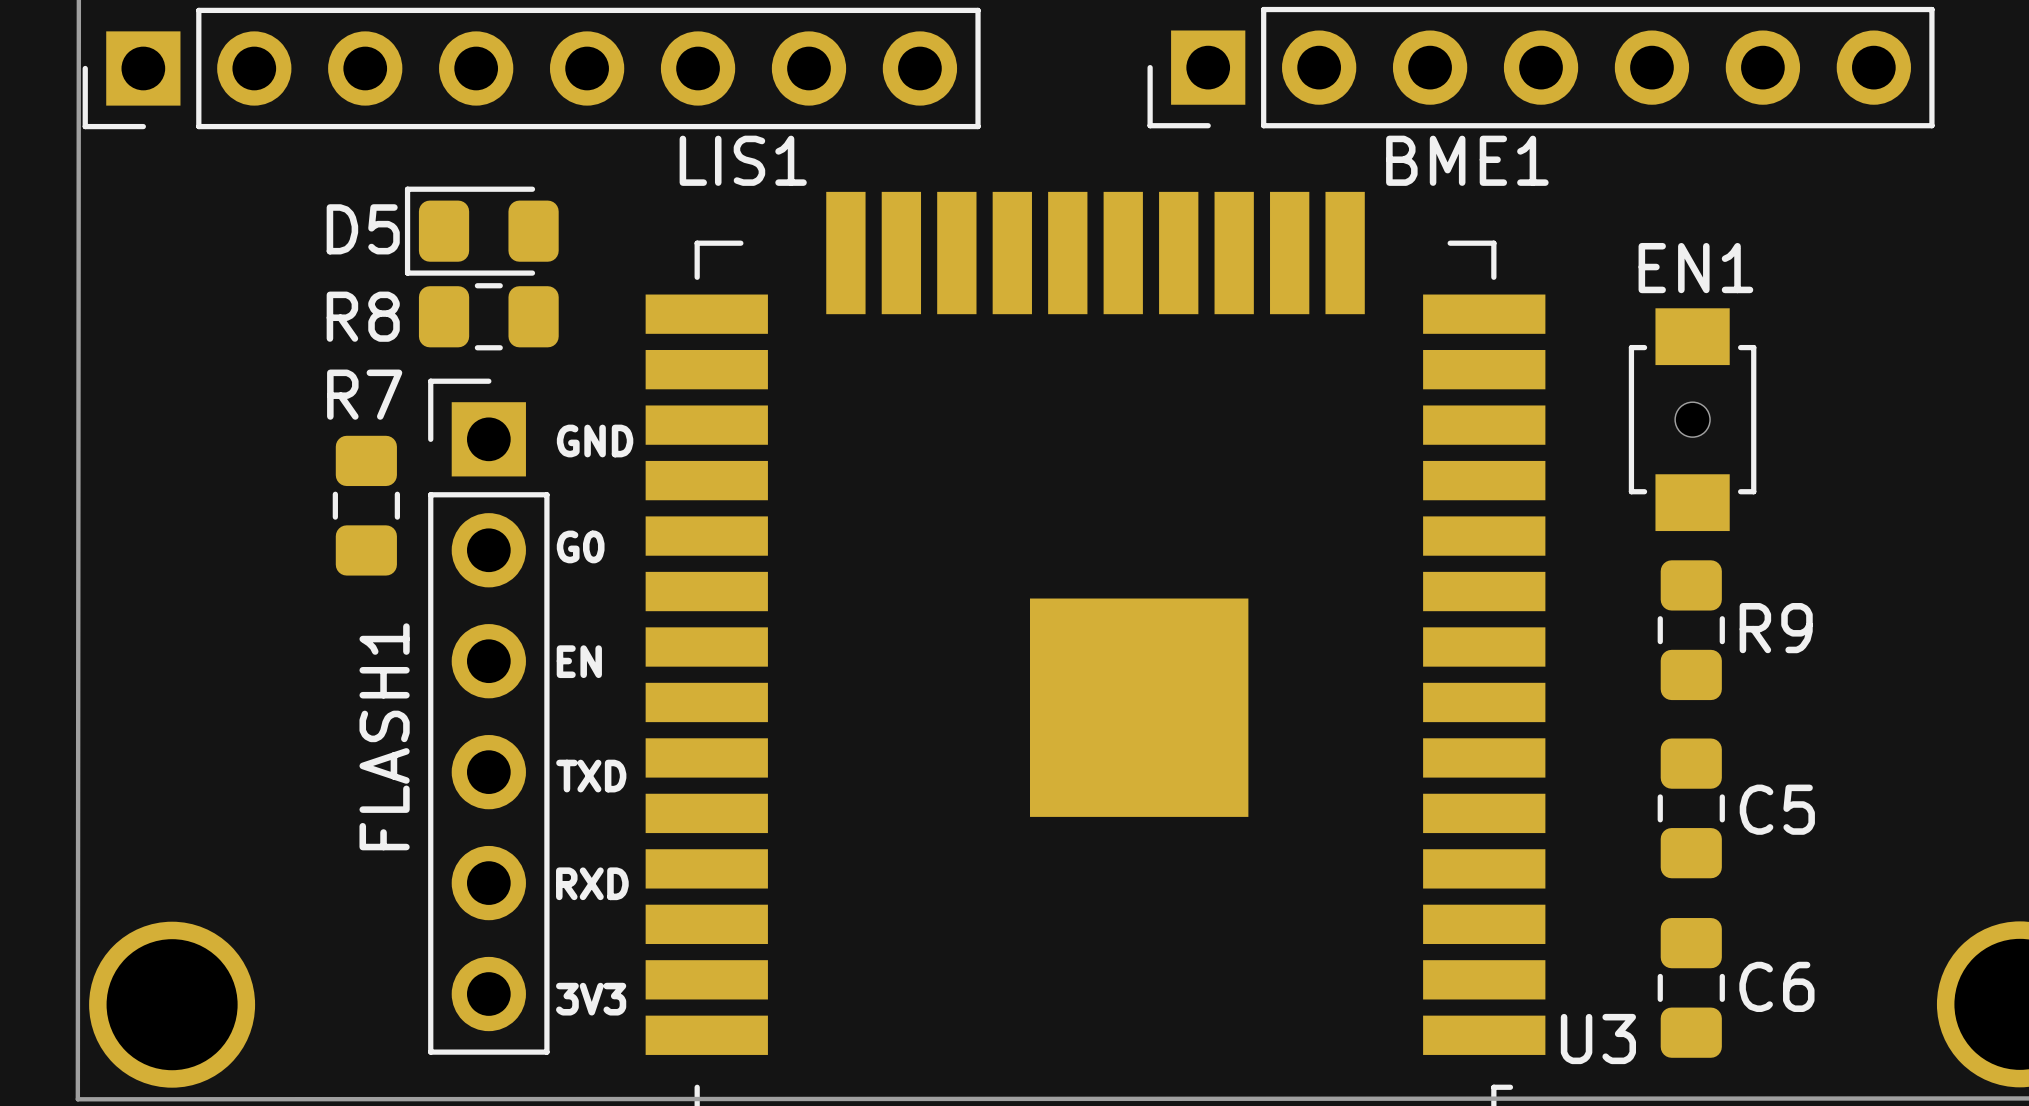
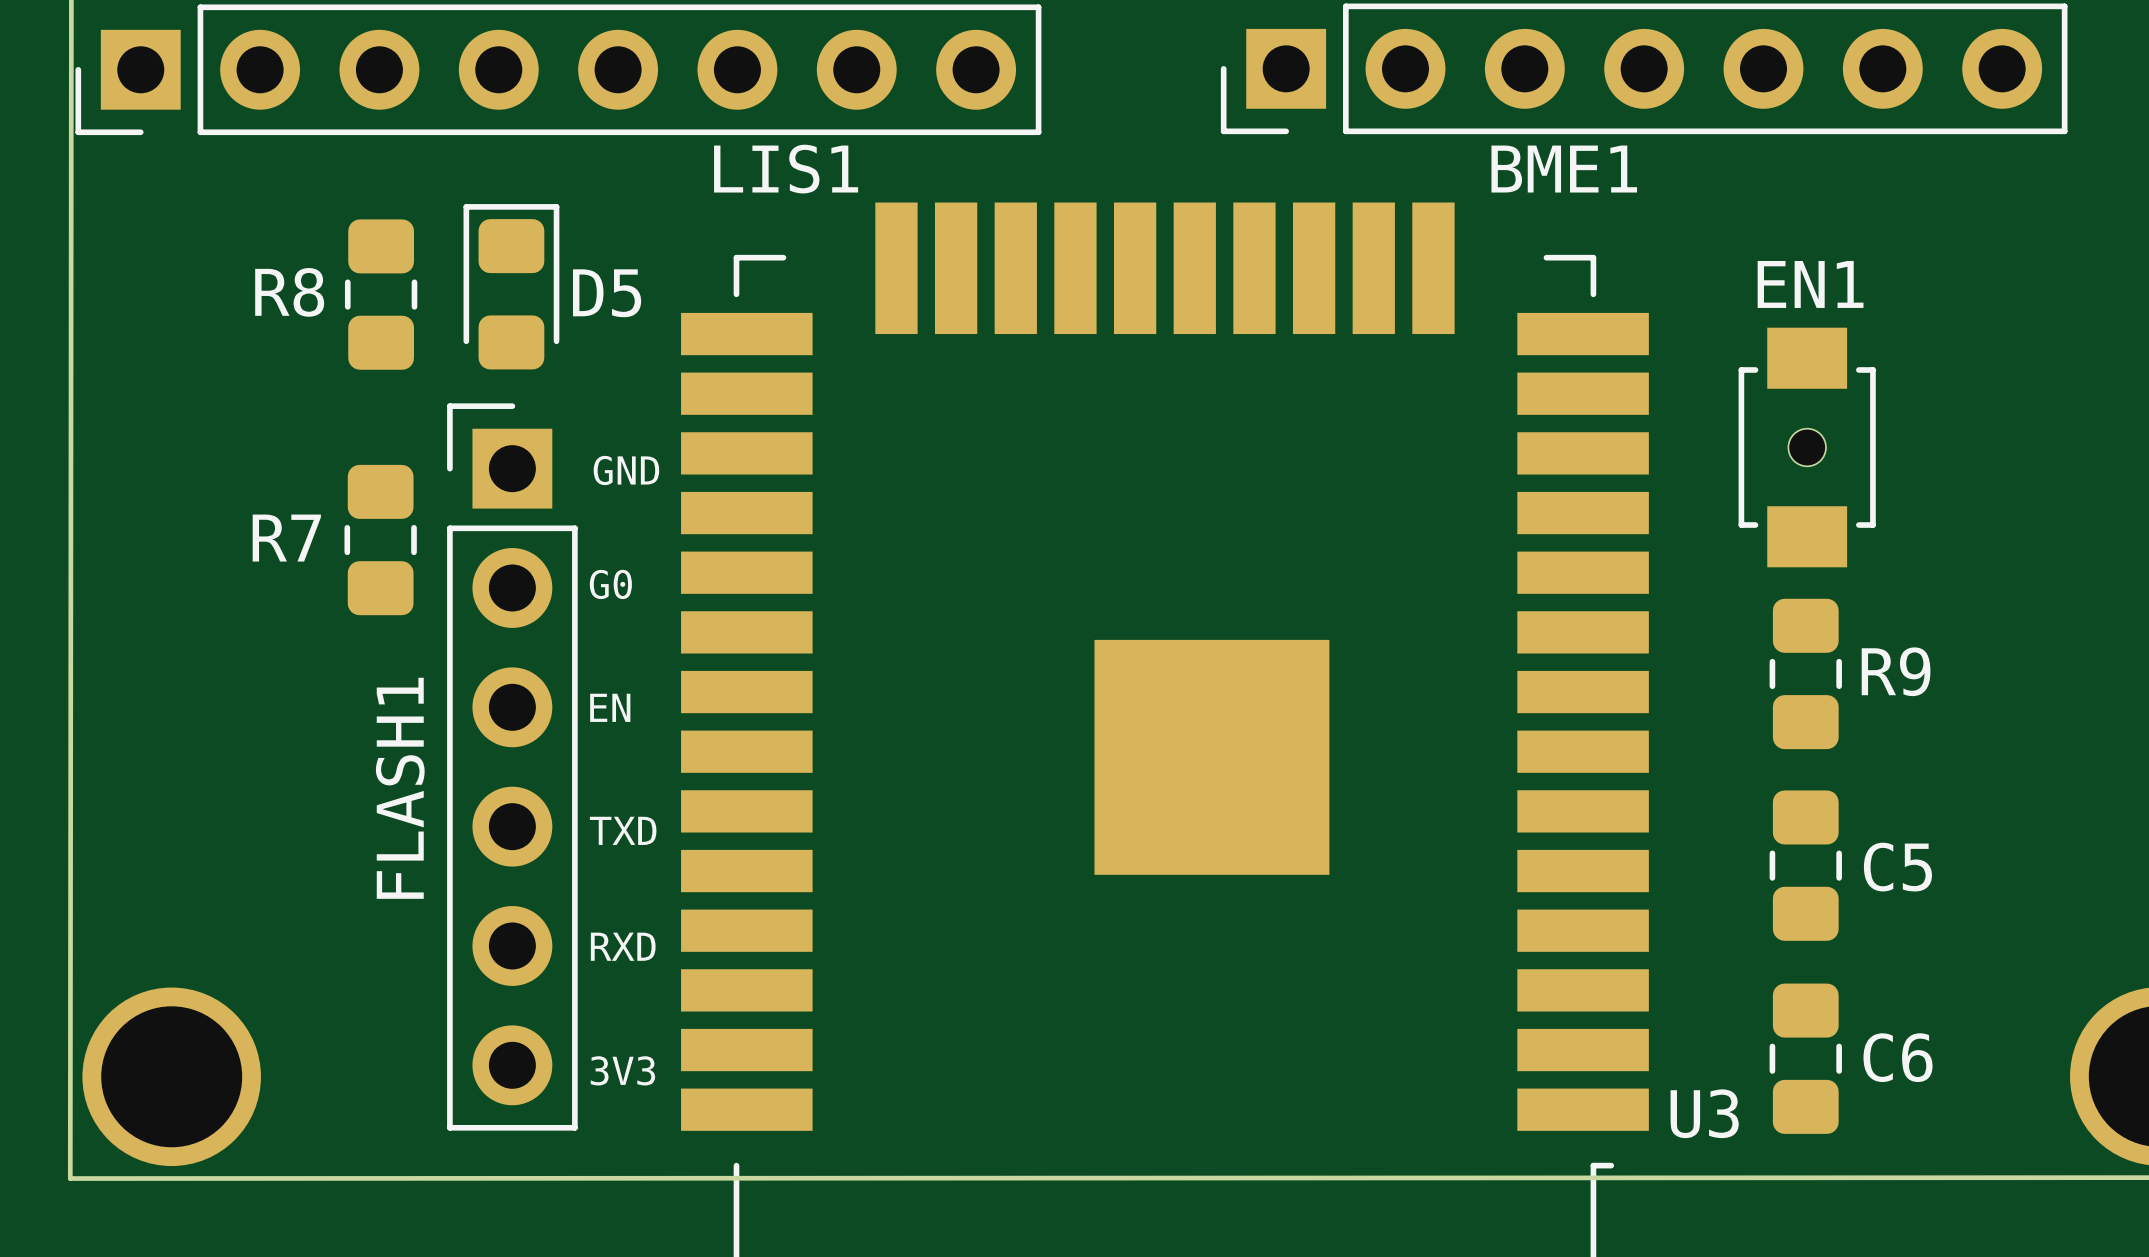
D5 name position: D5 (363, 229) -> D5 (607, 293)
D5 rotation: 0° (481, 231) -> 90° clockwise (511, 286)
R8 rotation: 0° (488, 316) -> 90° clockwise (381, 294)
R8 position: (488, 316) -> (381, 294)
R7 name position: R7 (364, 394) -> R7 (286, 538)

